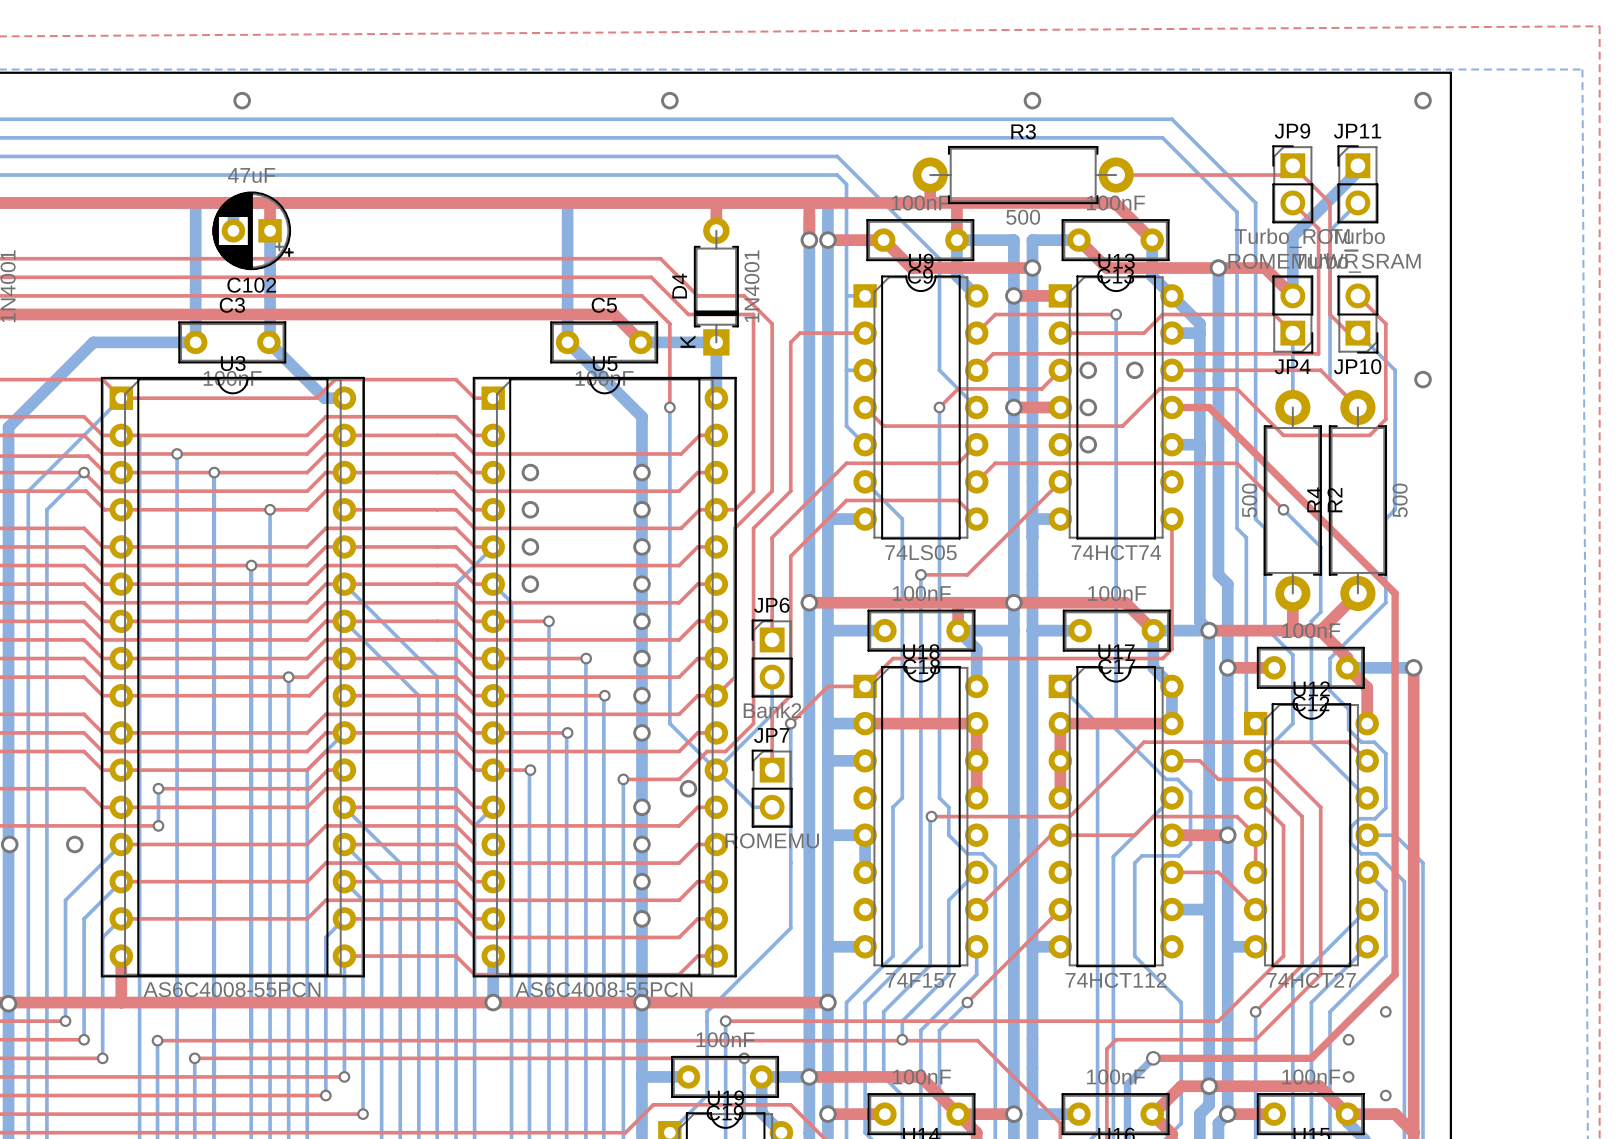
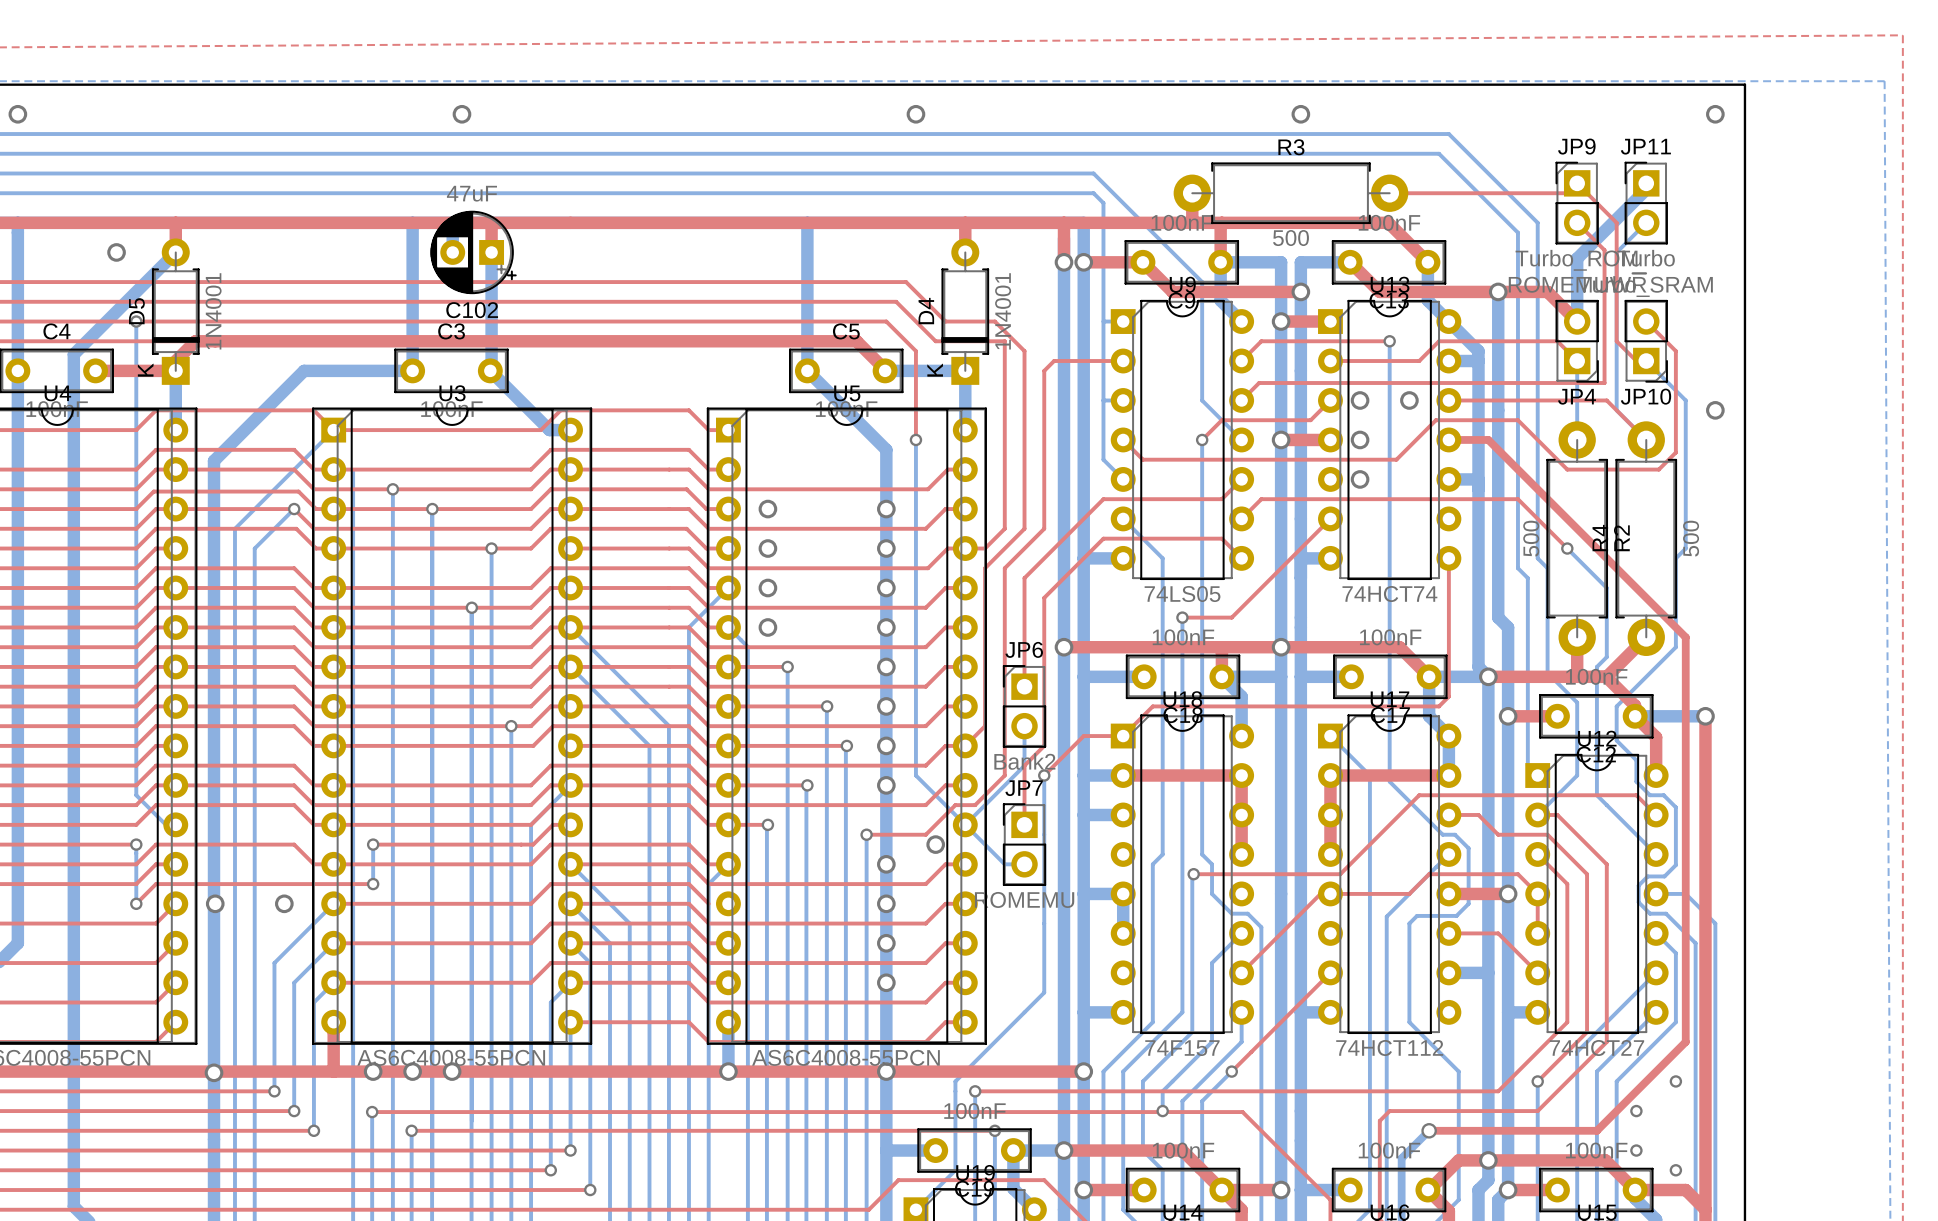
via: none -> (373, 1071)
via: none -> (412, 1071)
via: none -> (452, 1071)

